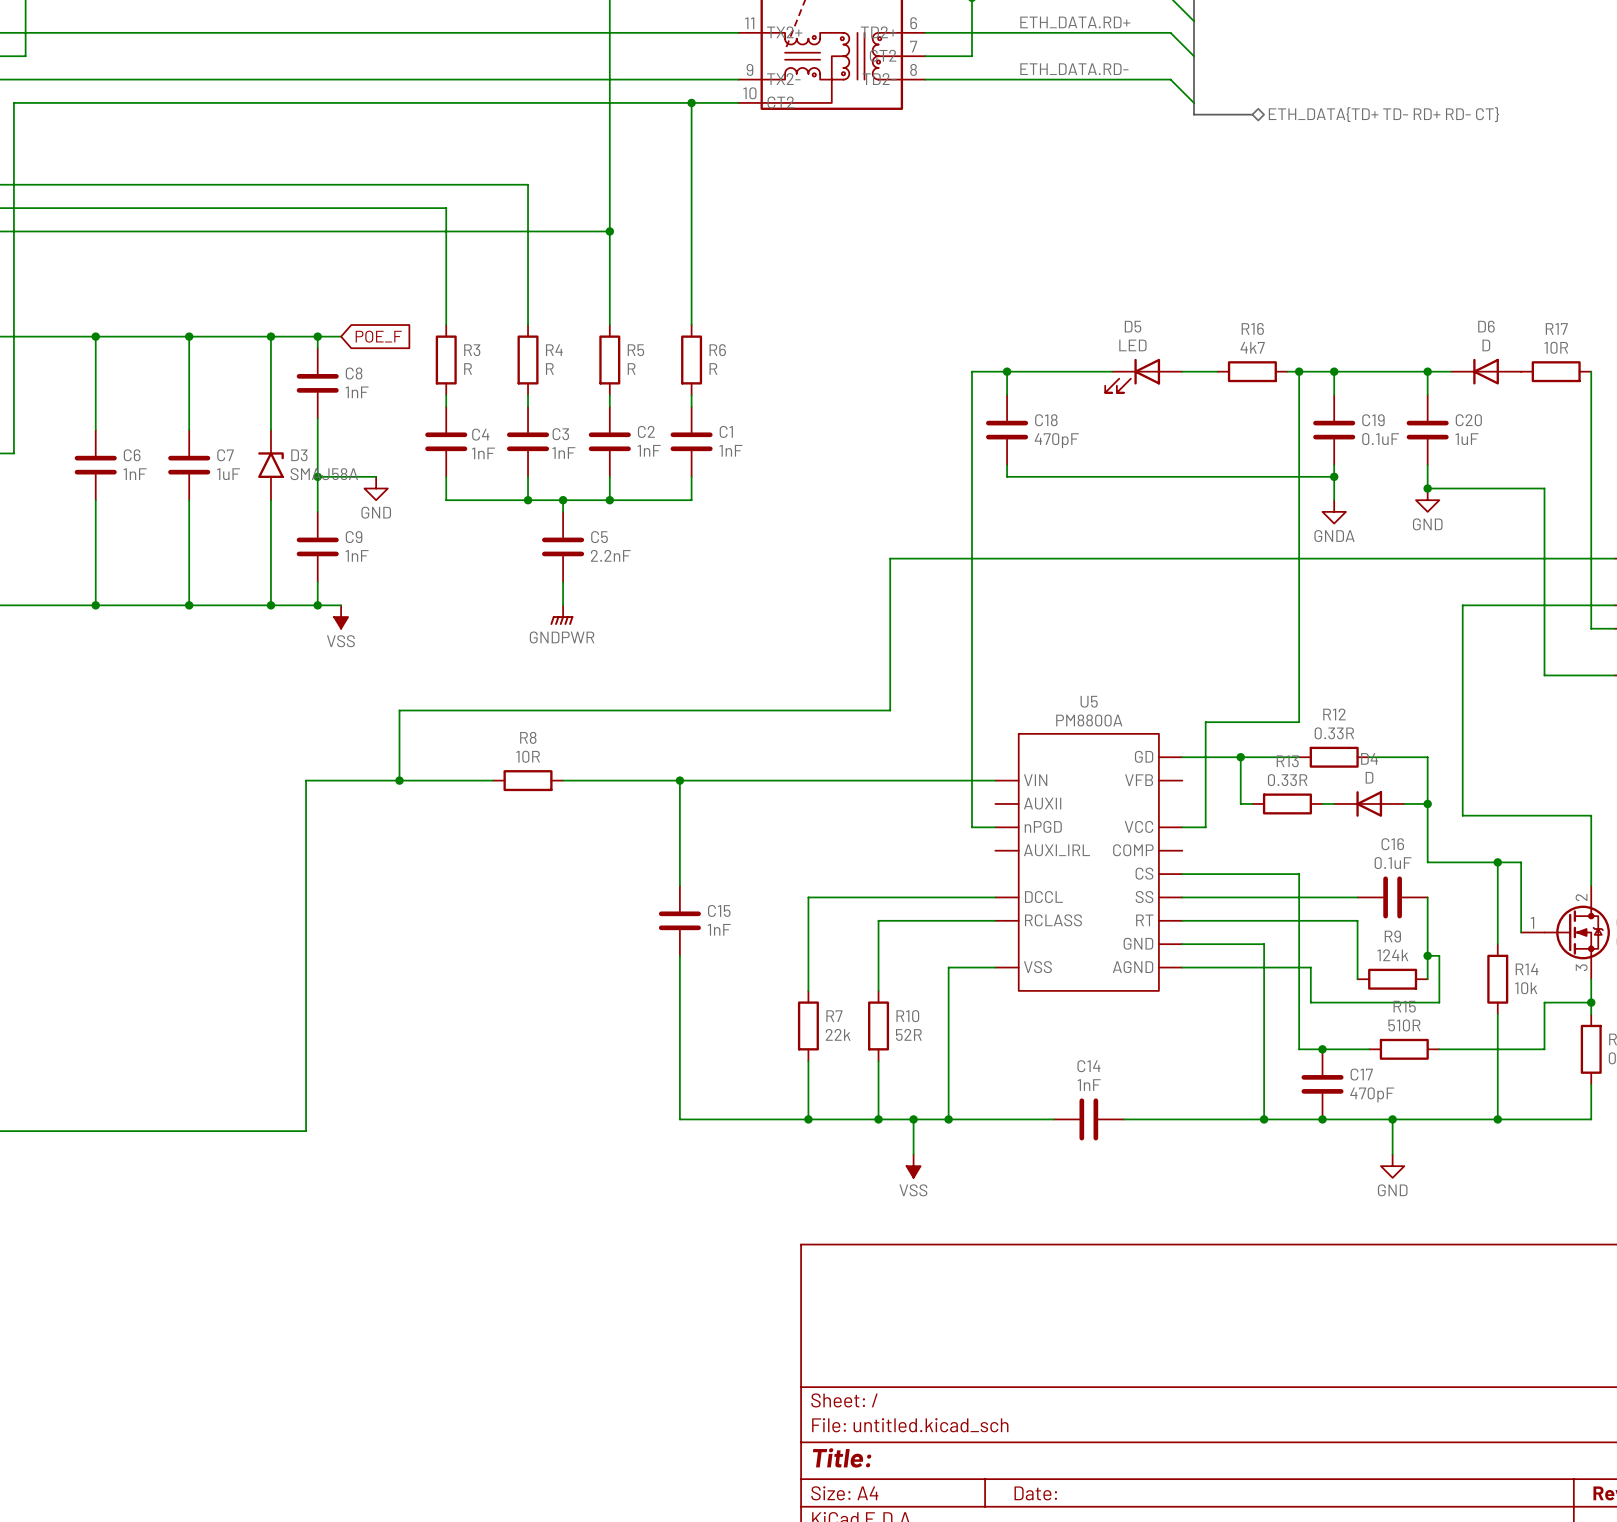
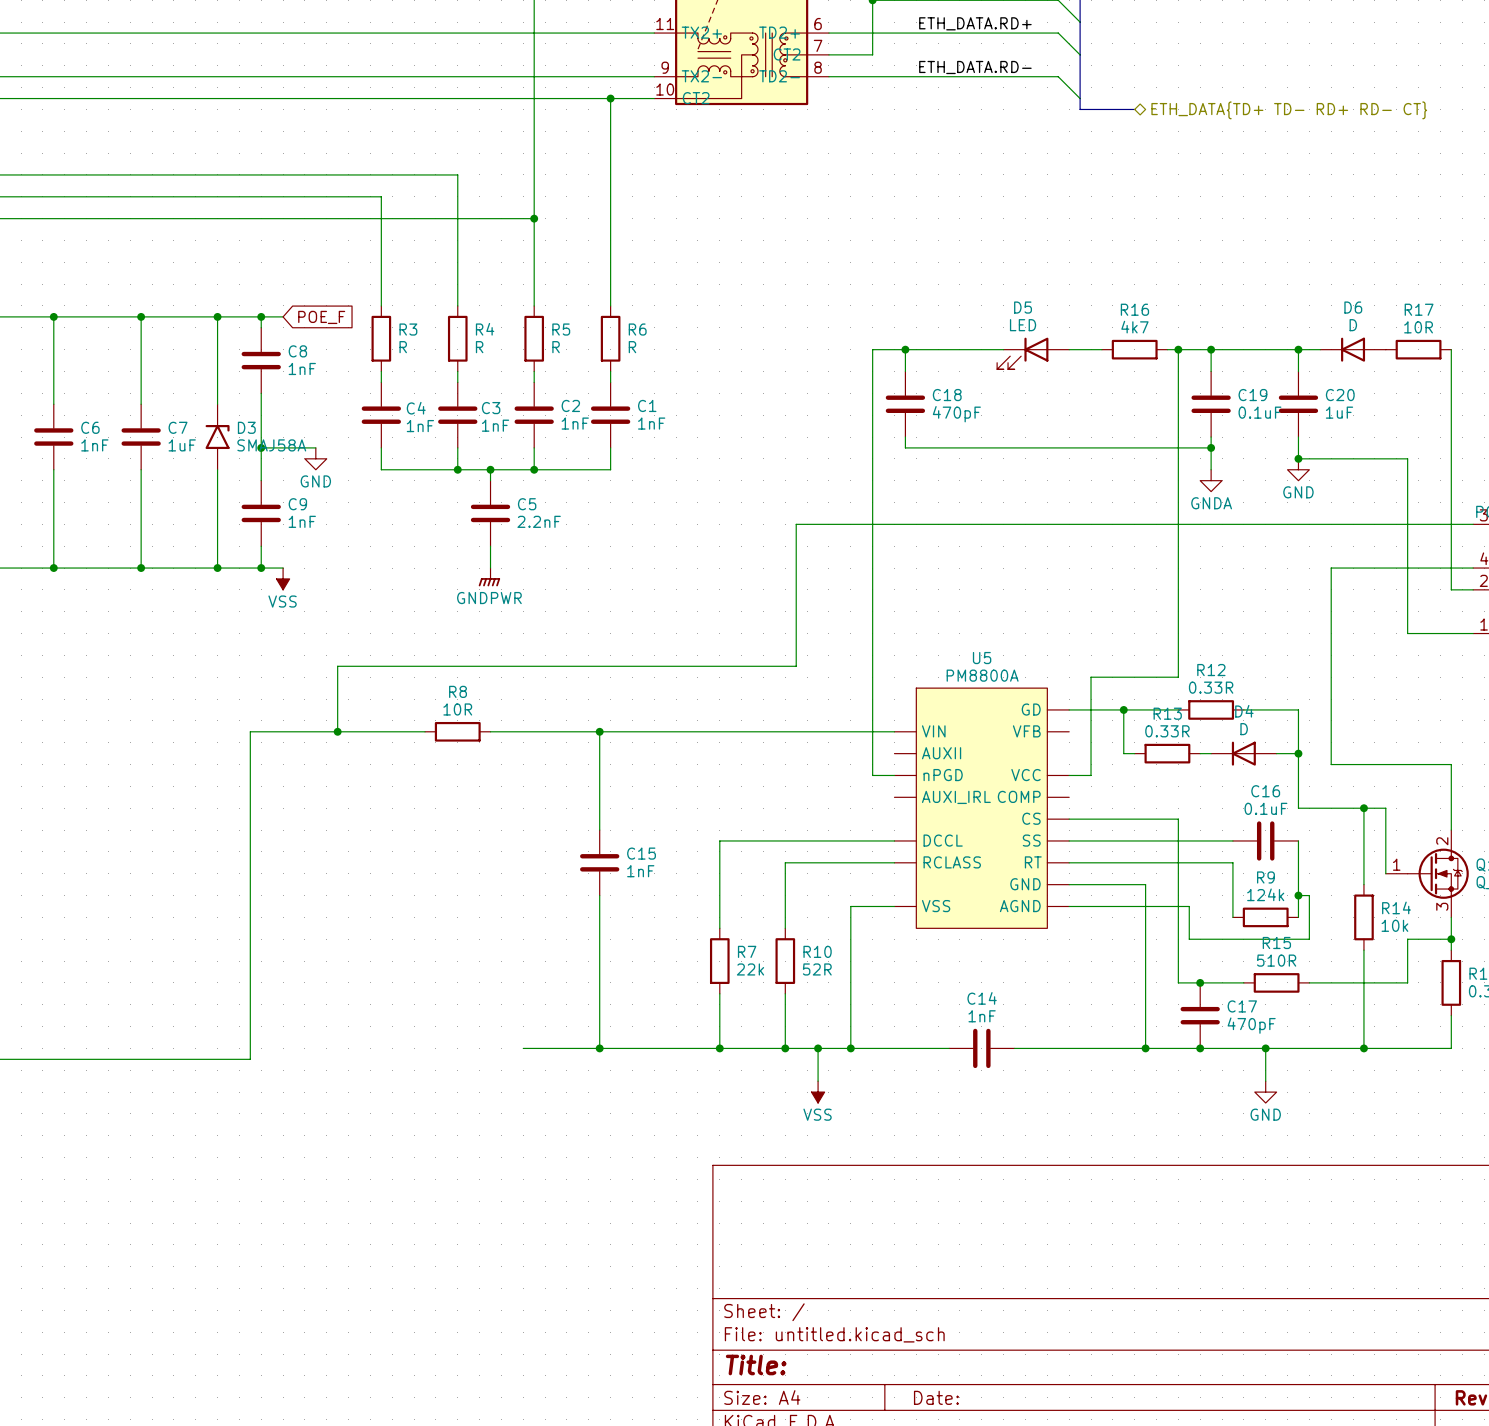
wire: none -> (523, 1048) (599, 1048)
junction: none -> (599, 1048)

